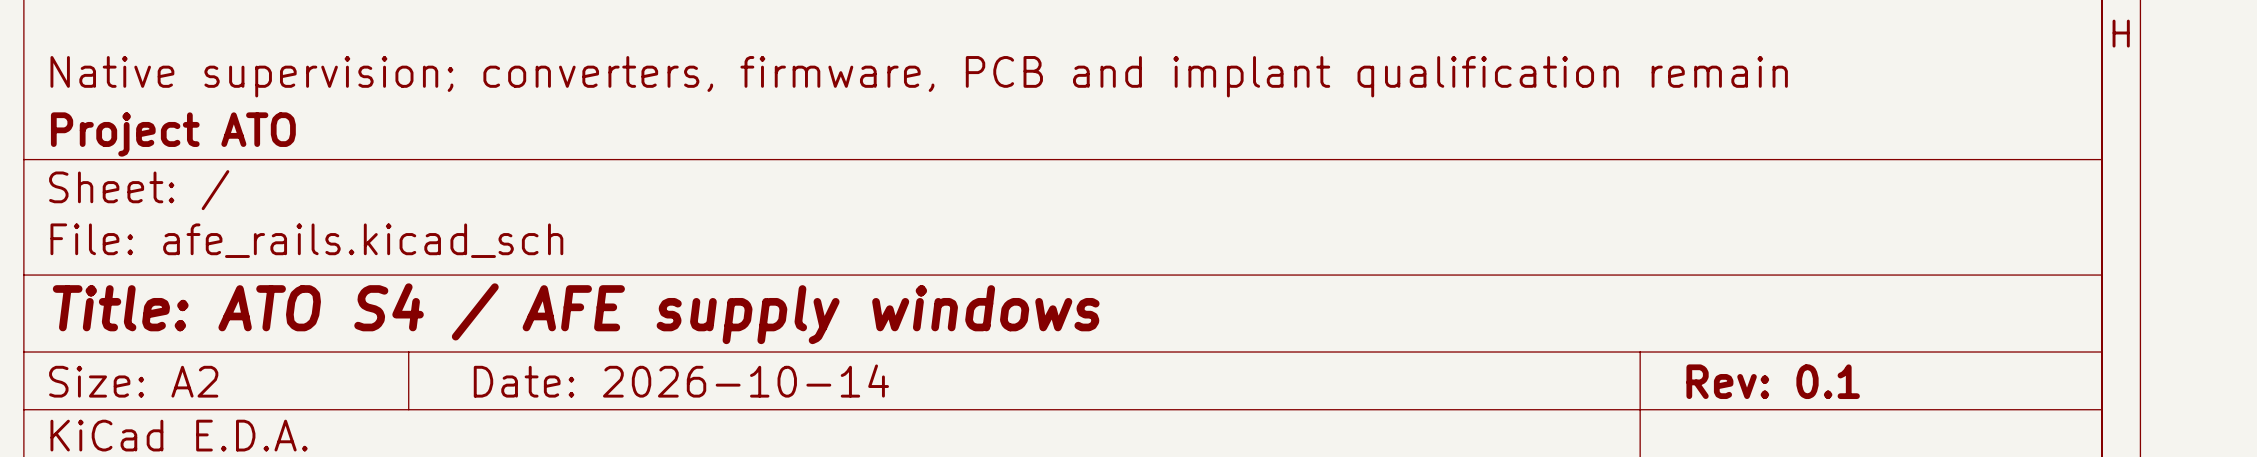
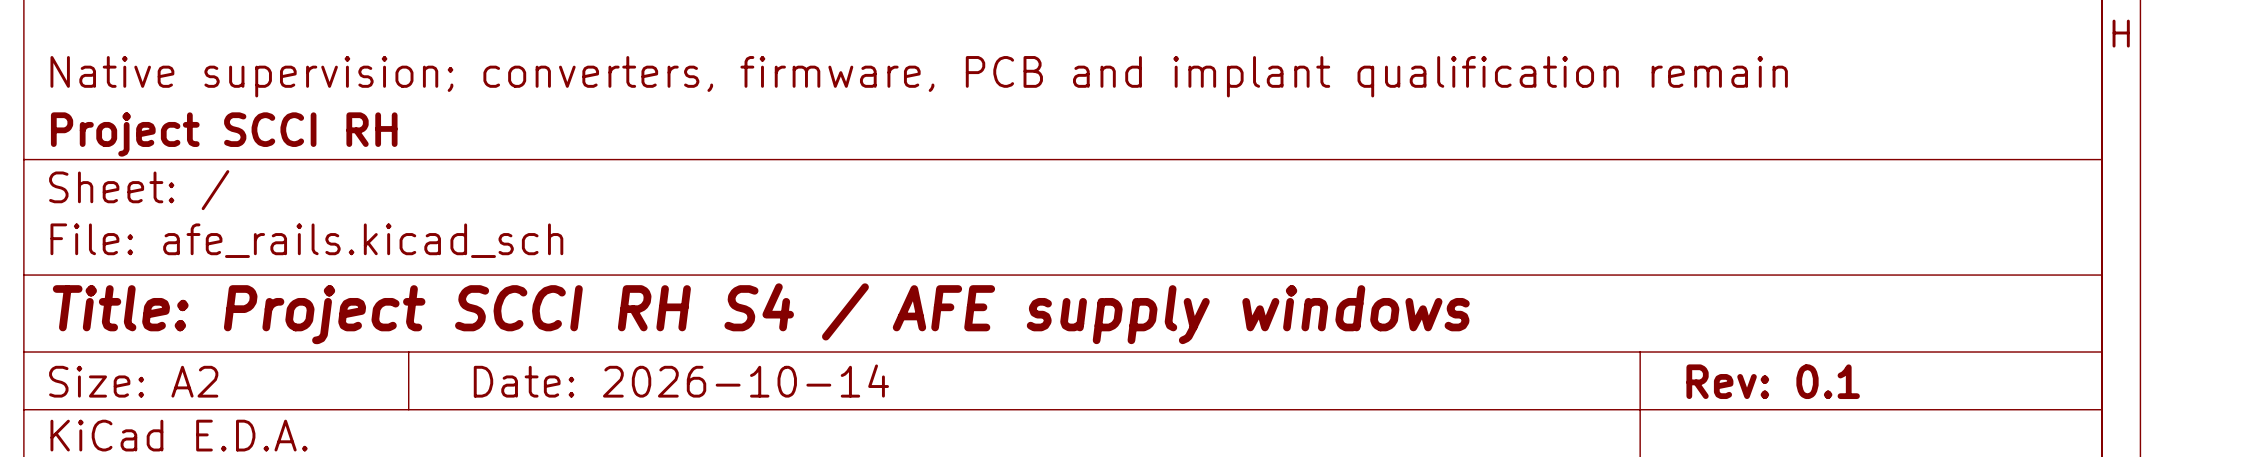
title block: Project ATO (173, 134) -> Project SCCI RH (224, 134)
title block: Title: ATO S4 / AFE supply windows (576, 313) -> Title: Project SCCI RH S4 / AFE supply windows (761, 313)

